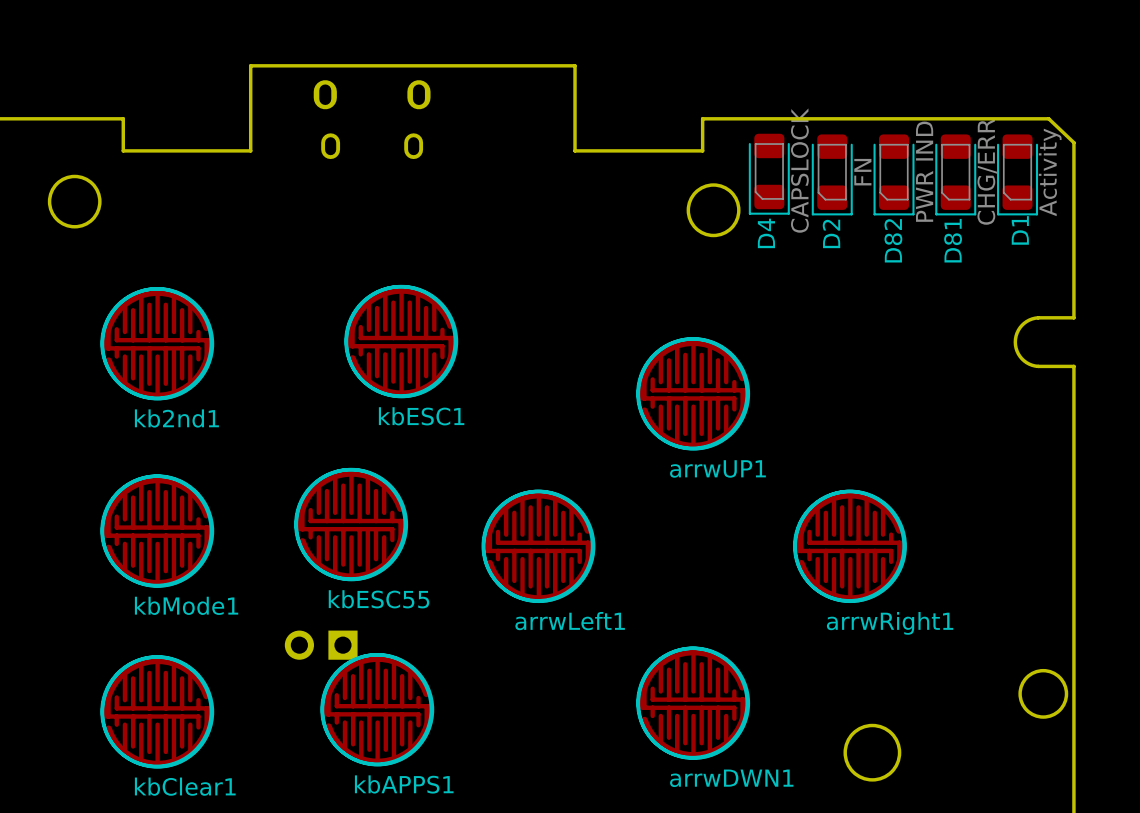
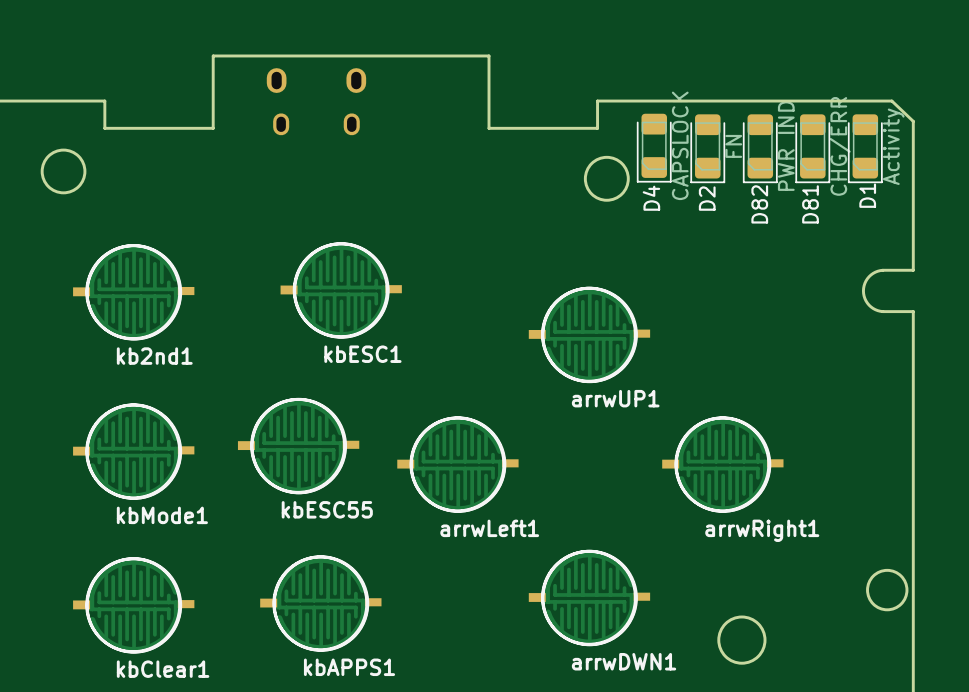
kbESC1 footprint: [344, 284, 459, 399] -> [280, 242, 402, 339]
kb2nd1 footprint: [100, 287, 215, 401] -> [73, 244, 195, 341]
arrwUP1 footprint: [636, 337, 751, 451] -> [528, 286, 651, 384]
kbESC55 footprint: [294, 467, 409, 582] -> [237, 397, 360, 495]
kbMode1 footprint: [100, 474, 215, 588] -> [73, 403, 195, 500]
arrwLeft1 footprint: [481, 489, 596, 604] -> [397, 416, 519, 513]
arrwRight1 footprint: [793, 489, 907, 604] -> [662, 416, 784, 513]
part: (321, 645) -> none
arrwDWN1 footprint: [636, 646, 751, 760] -> [528, 549, 651, 647]
kbAPPS1 footprint: [320, 653, 435, 767] -> [260, 555, 382, 652]
kbClear1 footprint: [100, 655, 215, 769] -> [73, 557, 195, 654]

